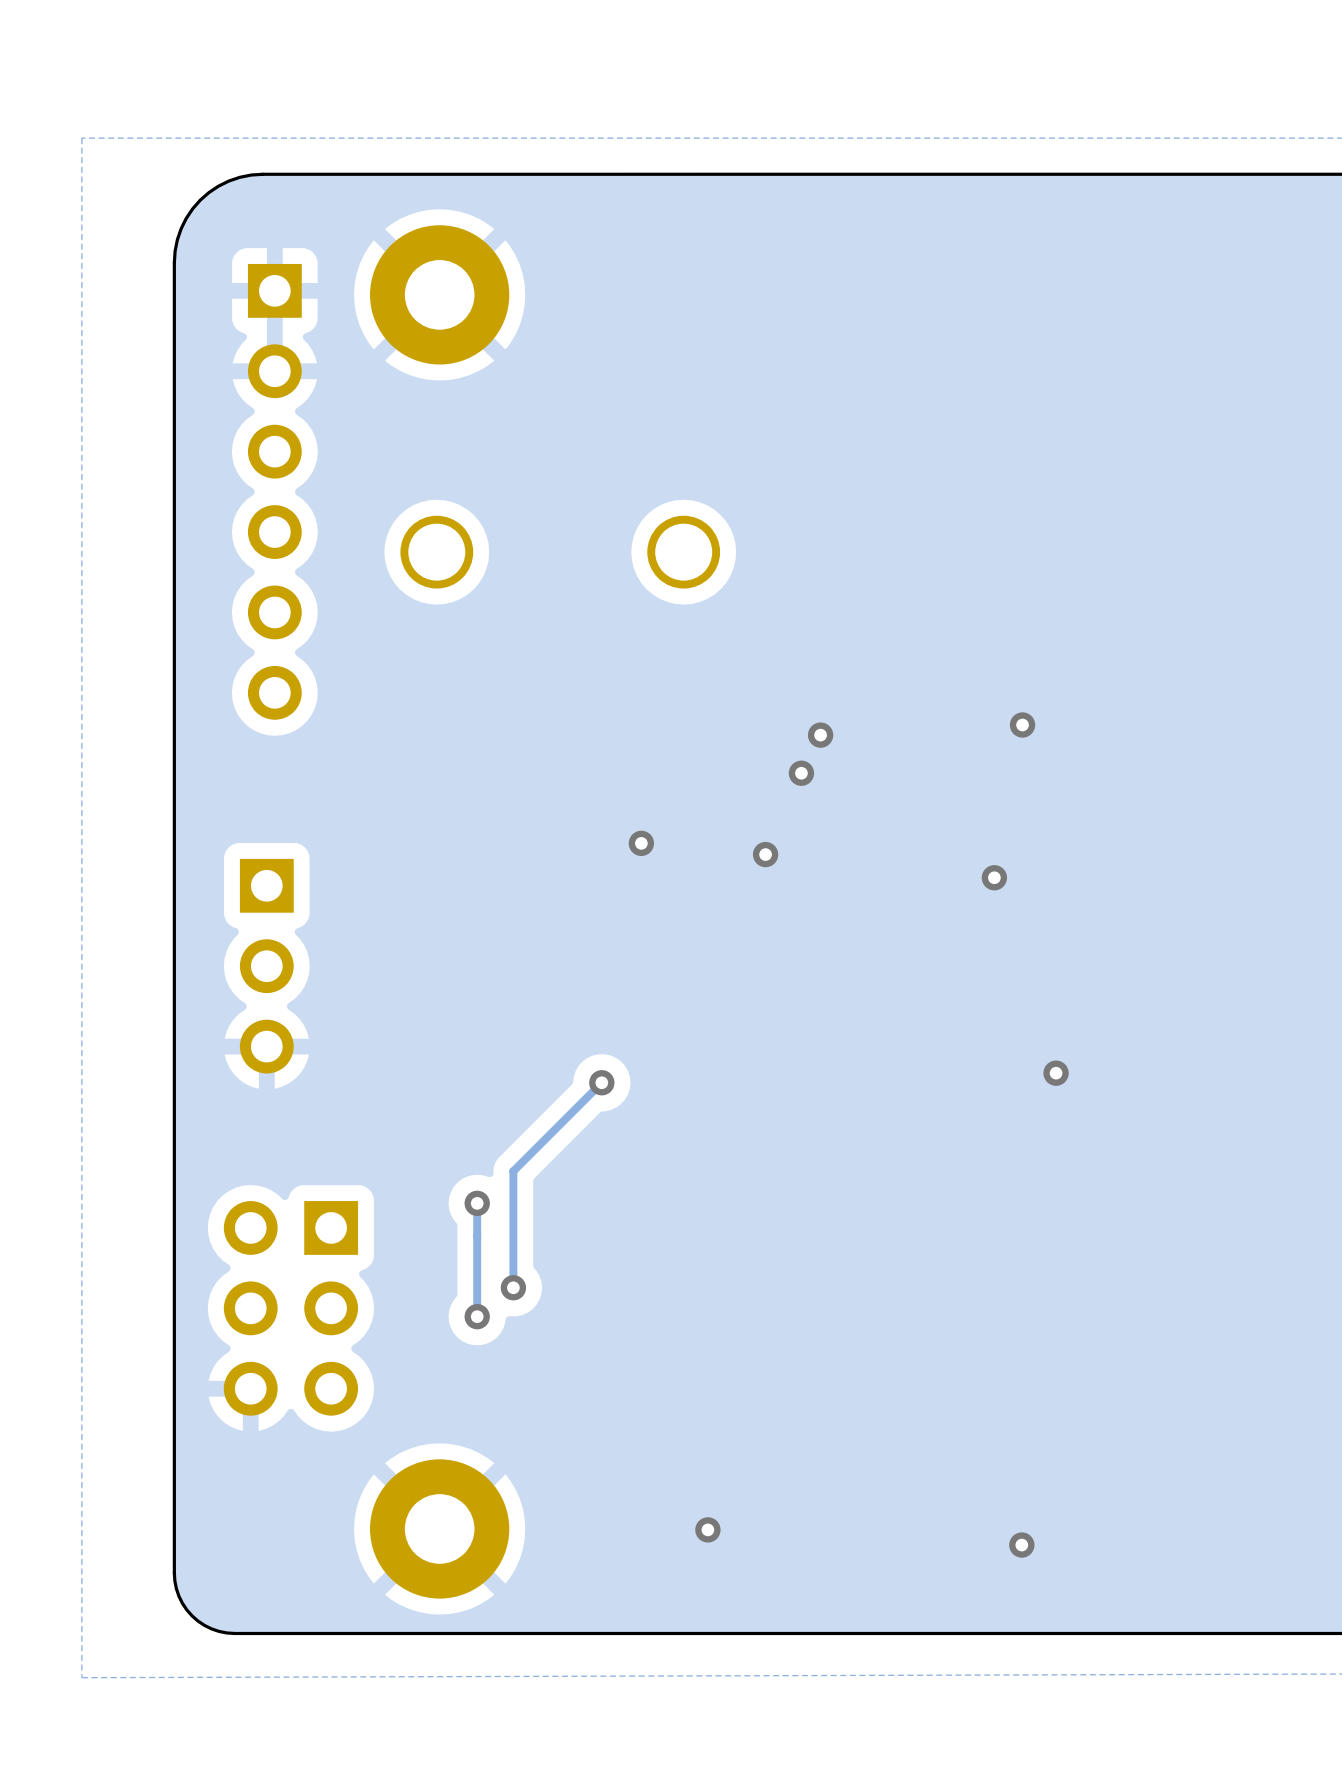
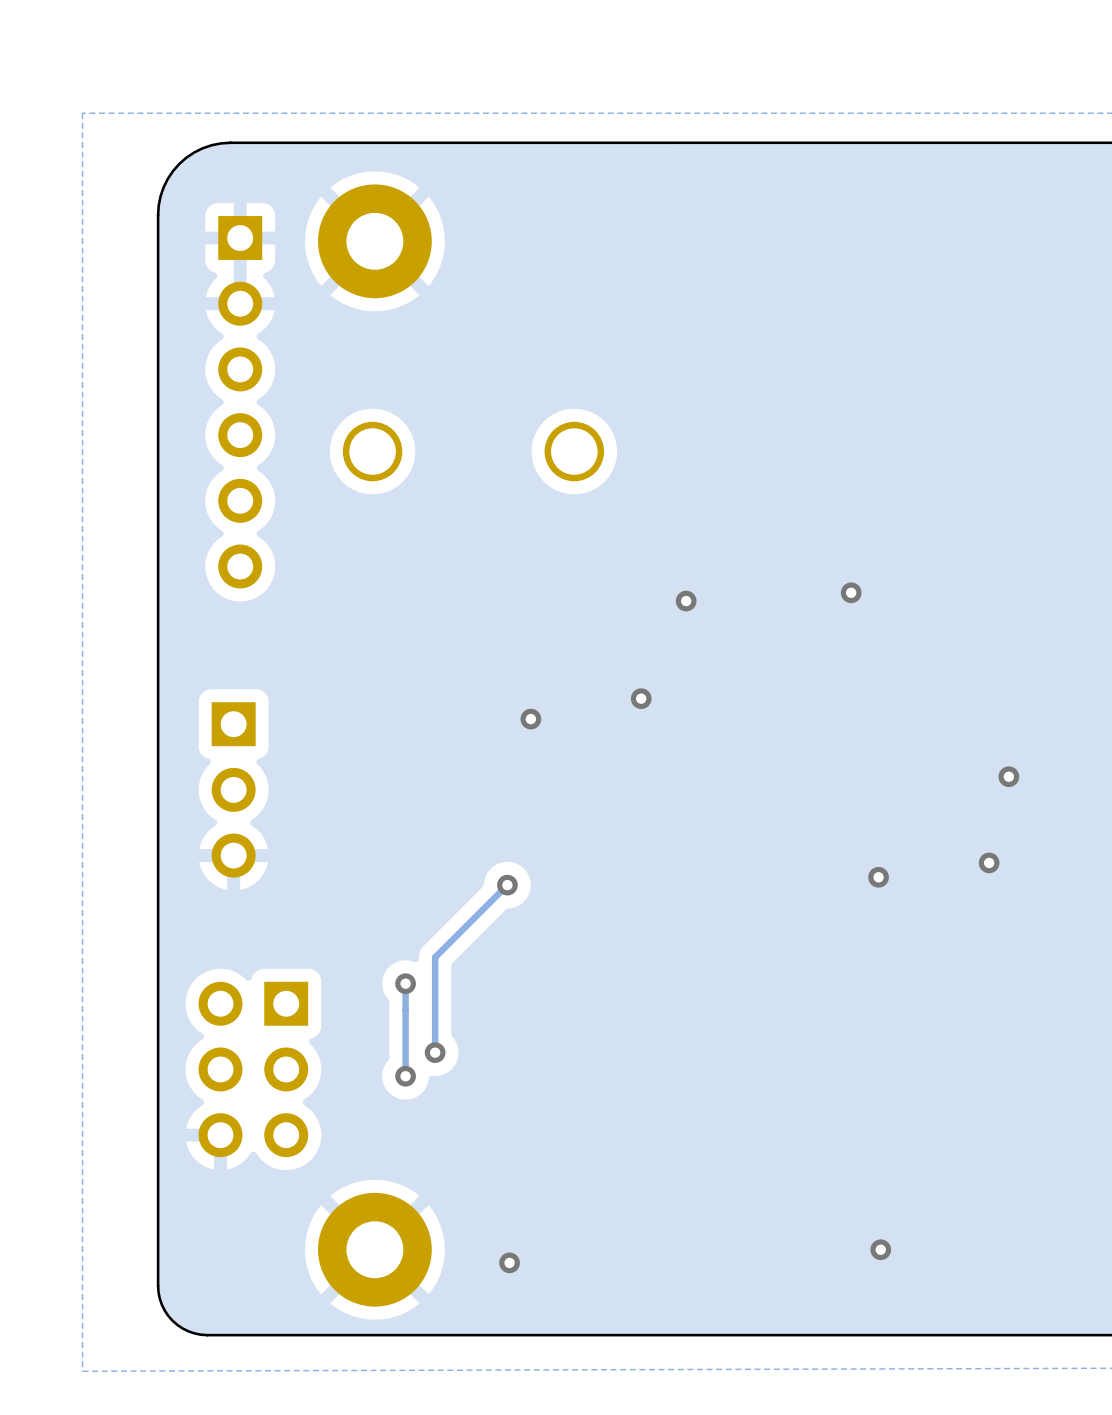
via: (801, 773) -> none
via position: (641, 843) -> (530, 719)
via: (994, 877) -> none
via: none -> (1008, 776)
via: none -> (989, 862)
via position: (707, 1529) -> (509, 1262)
via position: (1021, 1545) -> (880, 1249)

